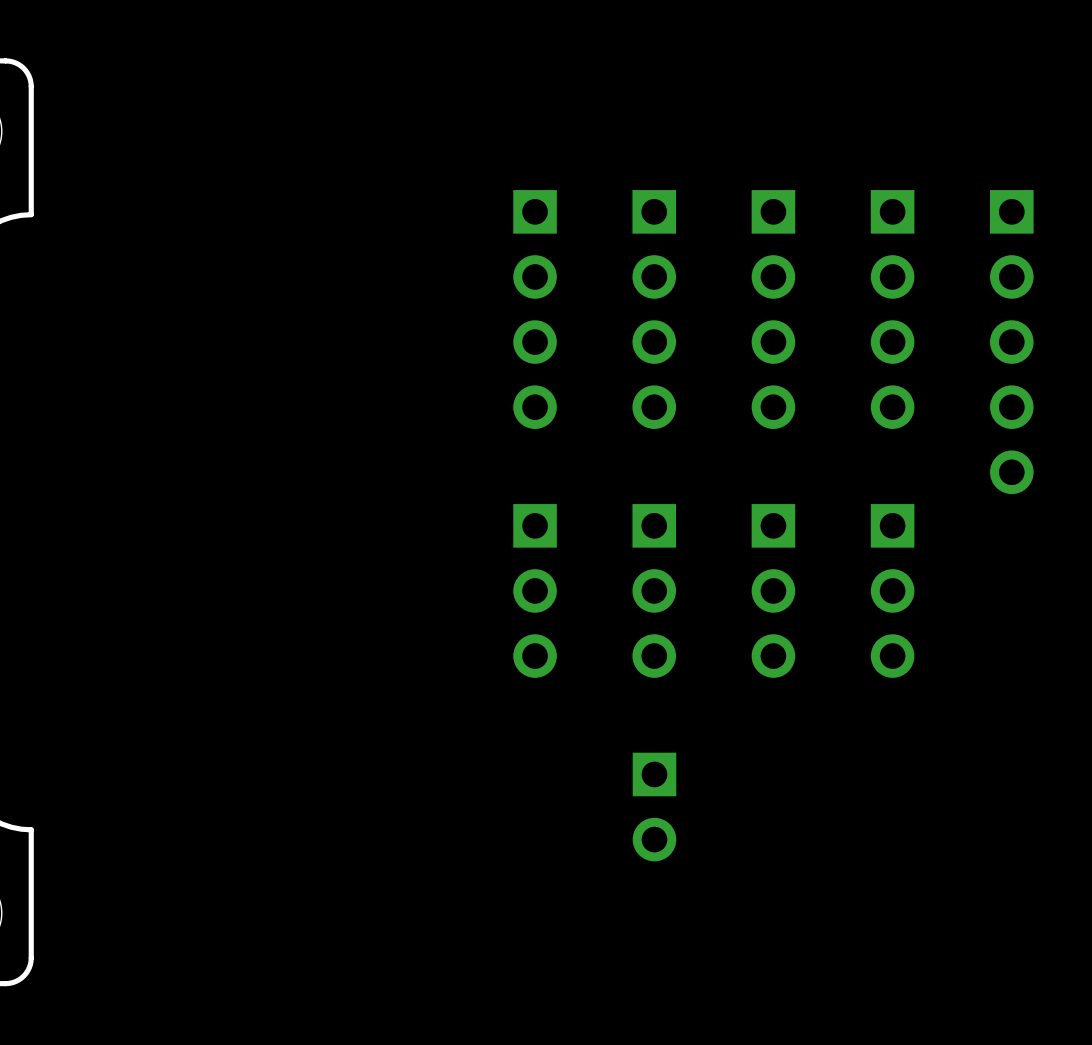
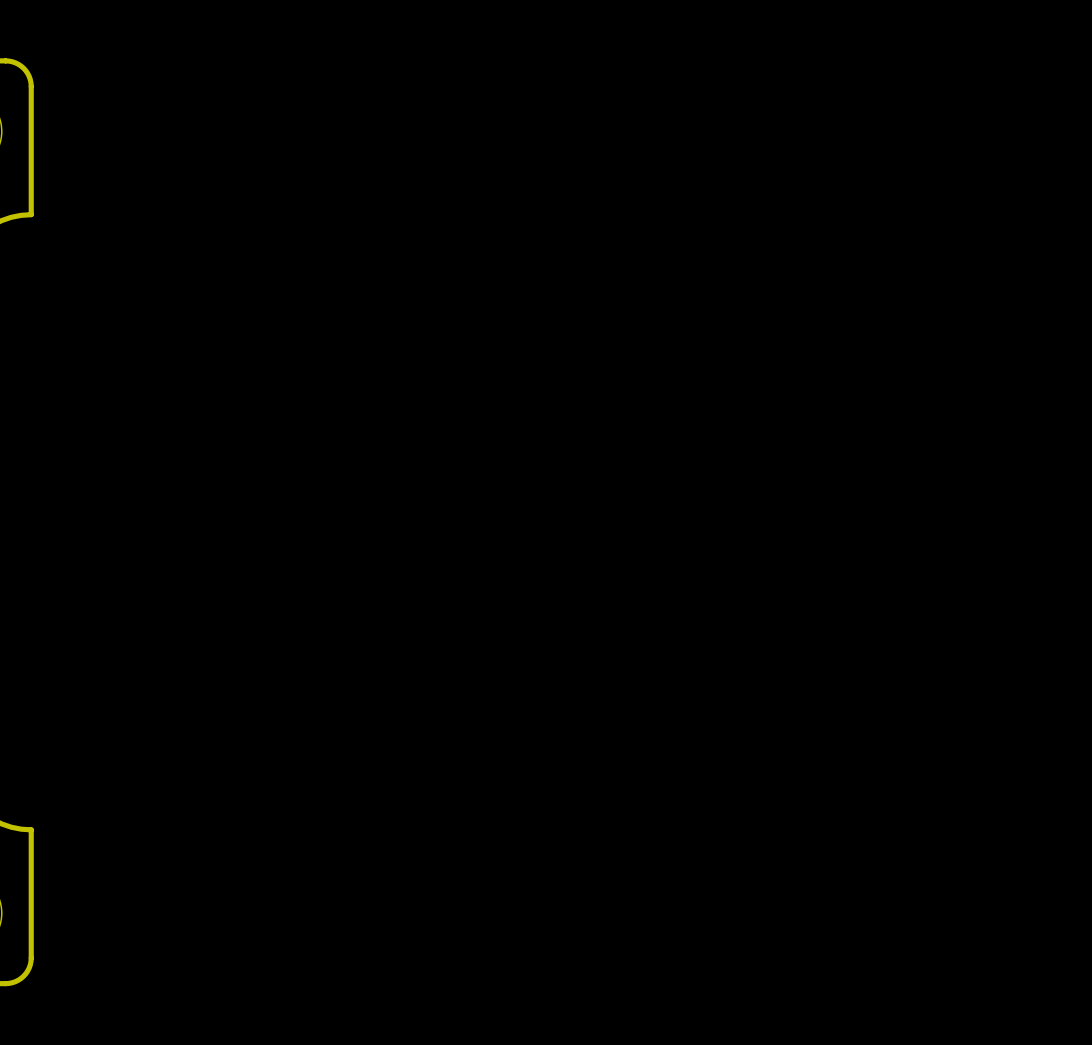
part: (535, 309) -> none
part: (654, 309) -> none
part: (773, 309) -> none
part: (892, 309) -> none
part: (1011, 342) -> none
part: (535, 590) -> none
part: (654, 590) -> none
part: (773, 590) -> none
part: (892, 590) -> none
part: (654, 807) -> none

